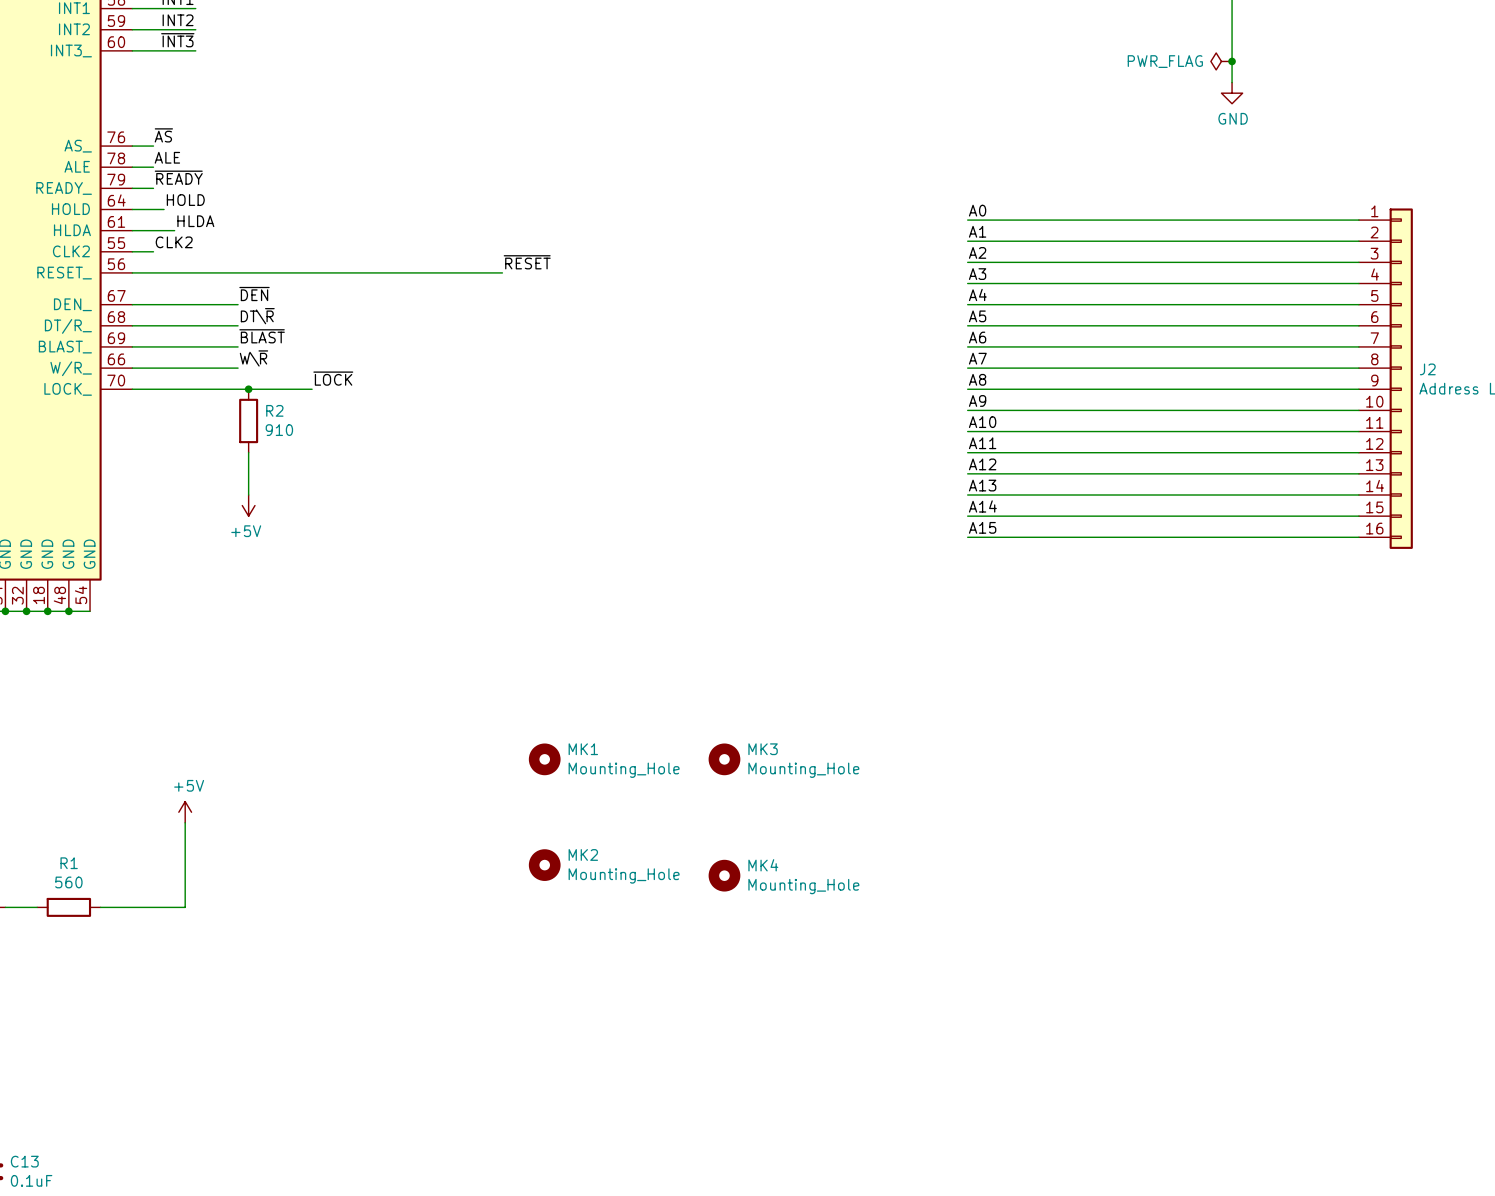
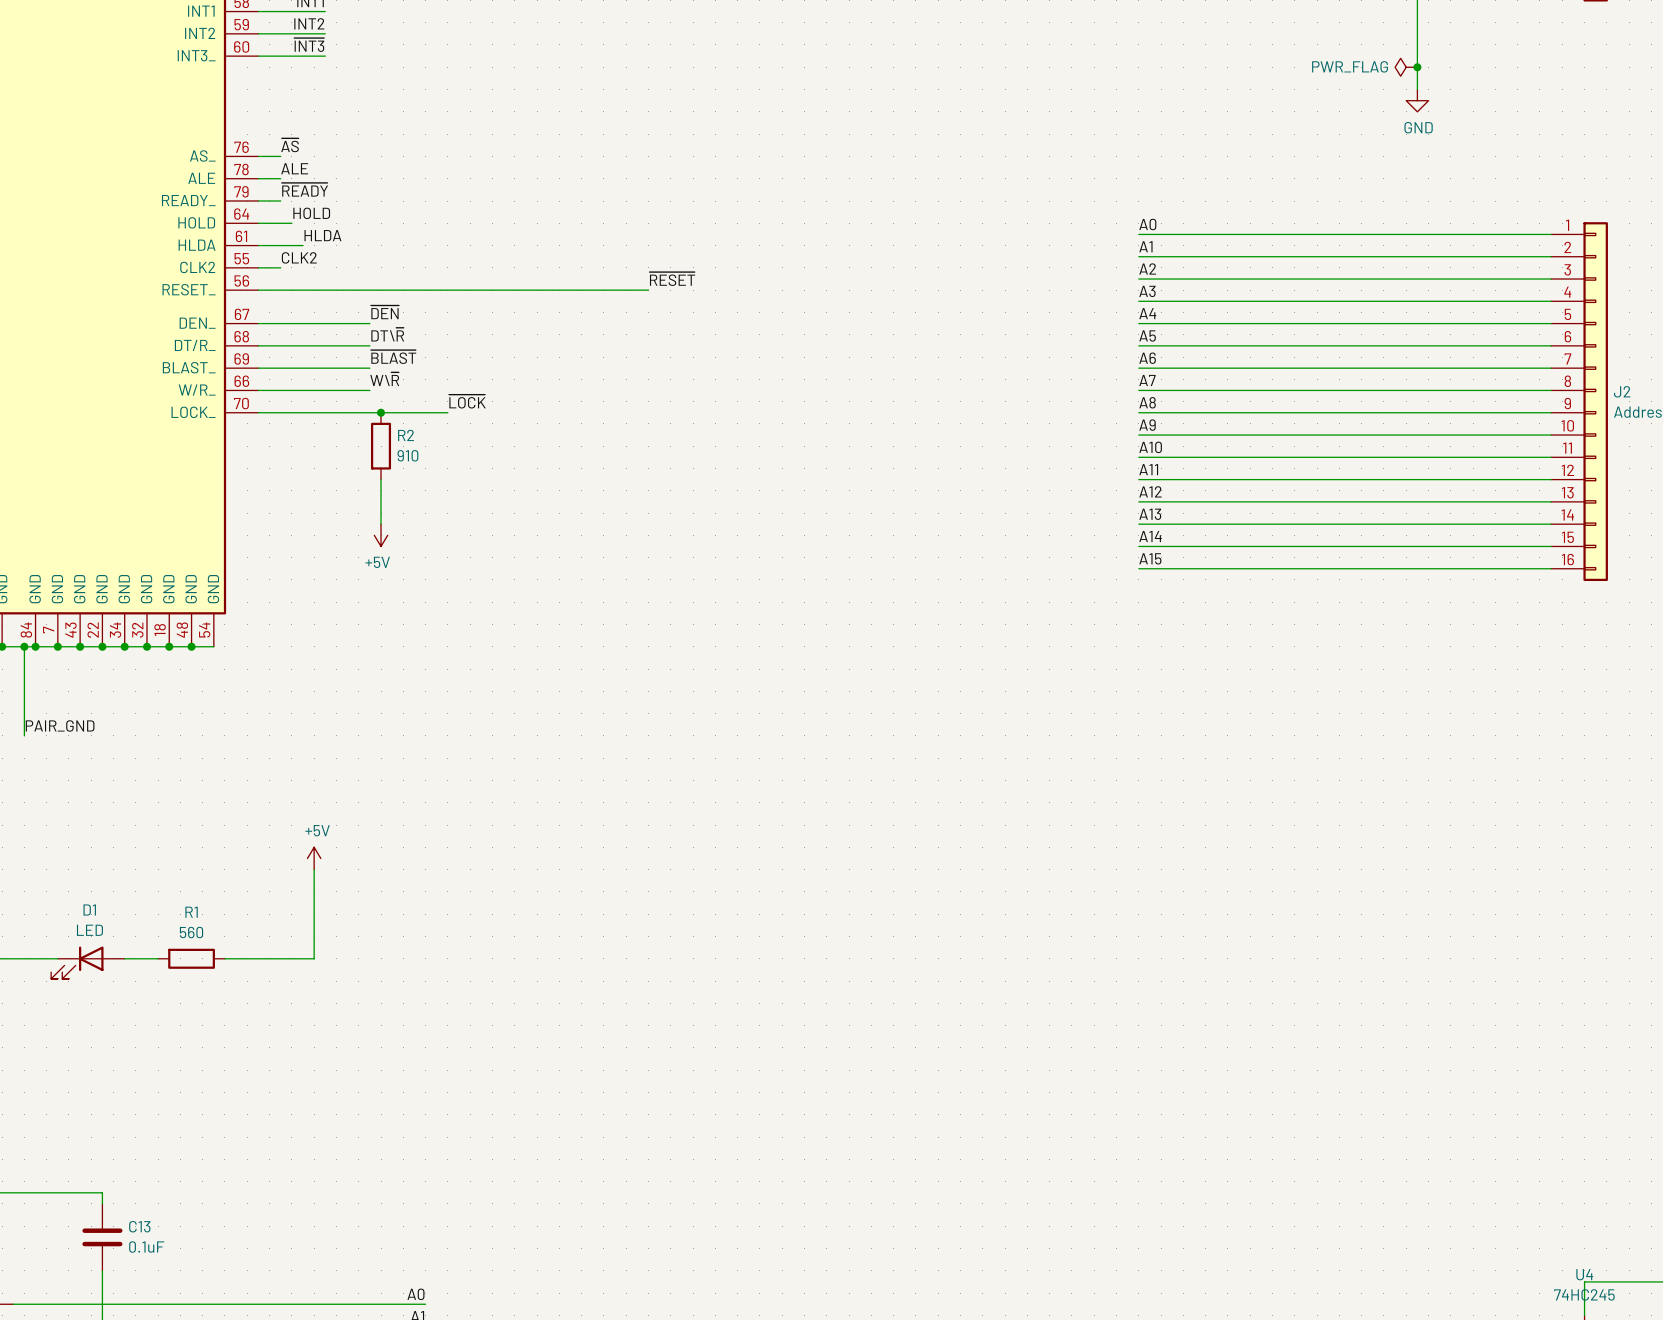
MK1: Mounting_Hole (544, 759) -> none
MK3: Mounting_Hole (724, 759) -> none
MK2: Mounting_Hole (544, 865) -> none
MK4: Mounting_Hole (724, 875) -> none

